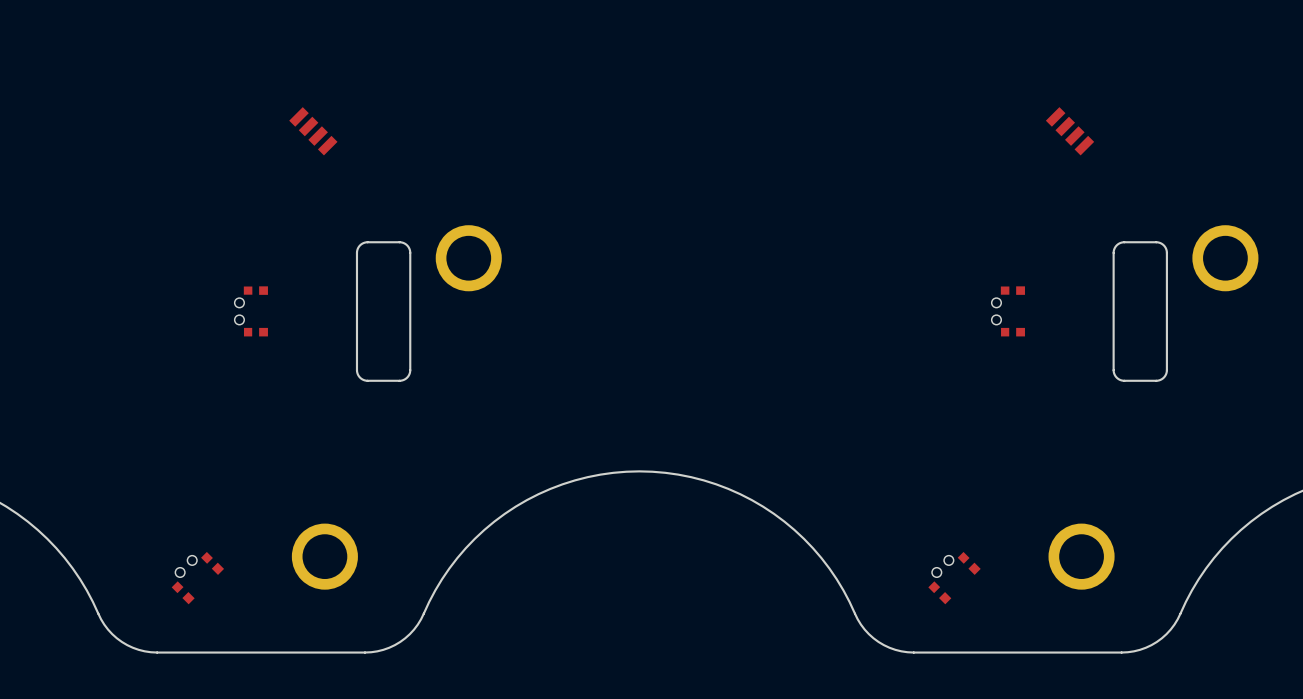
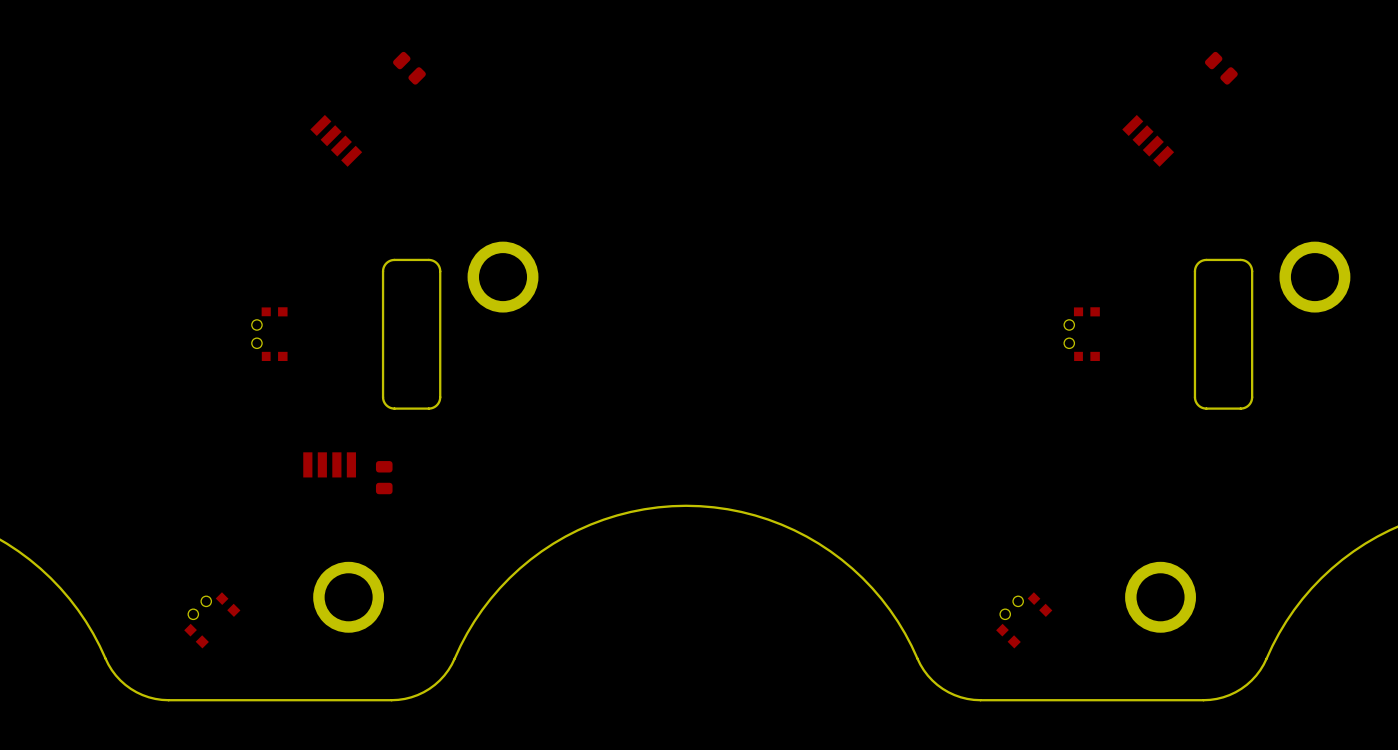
part: none -> (409, 68)
part: none -> (1221, 68)
part: none -> (329, 464)
part: none -> (384, 477)

